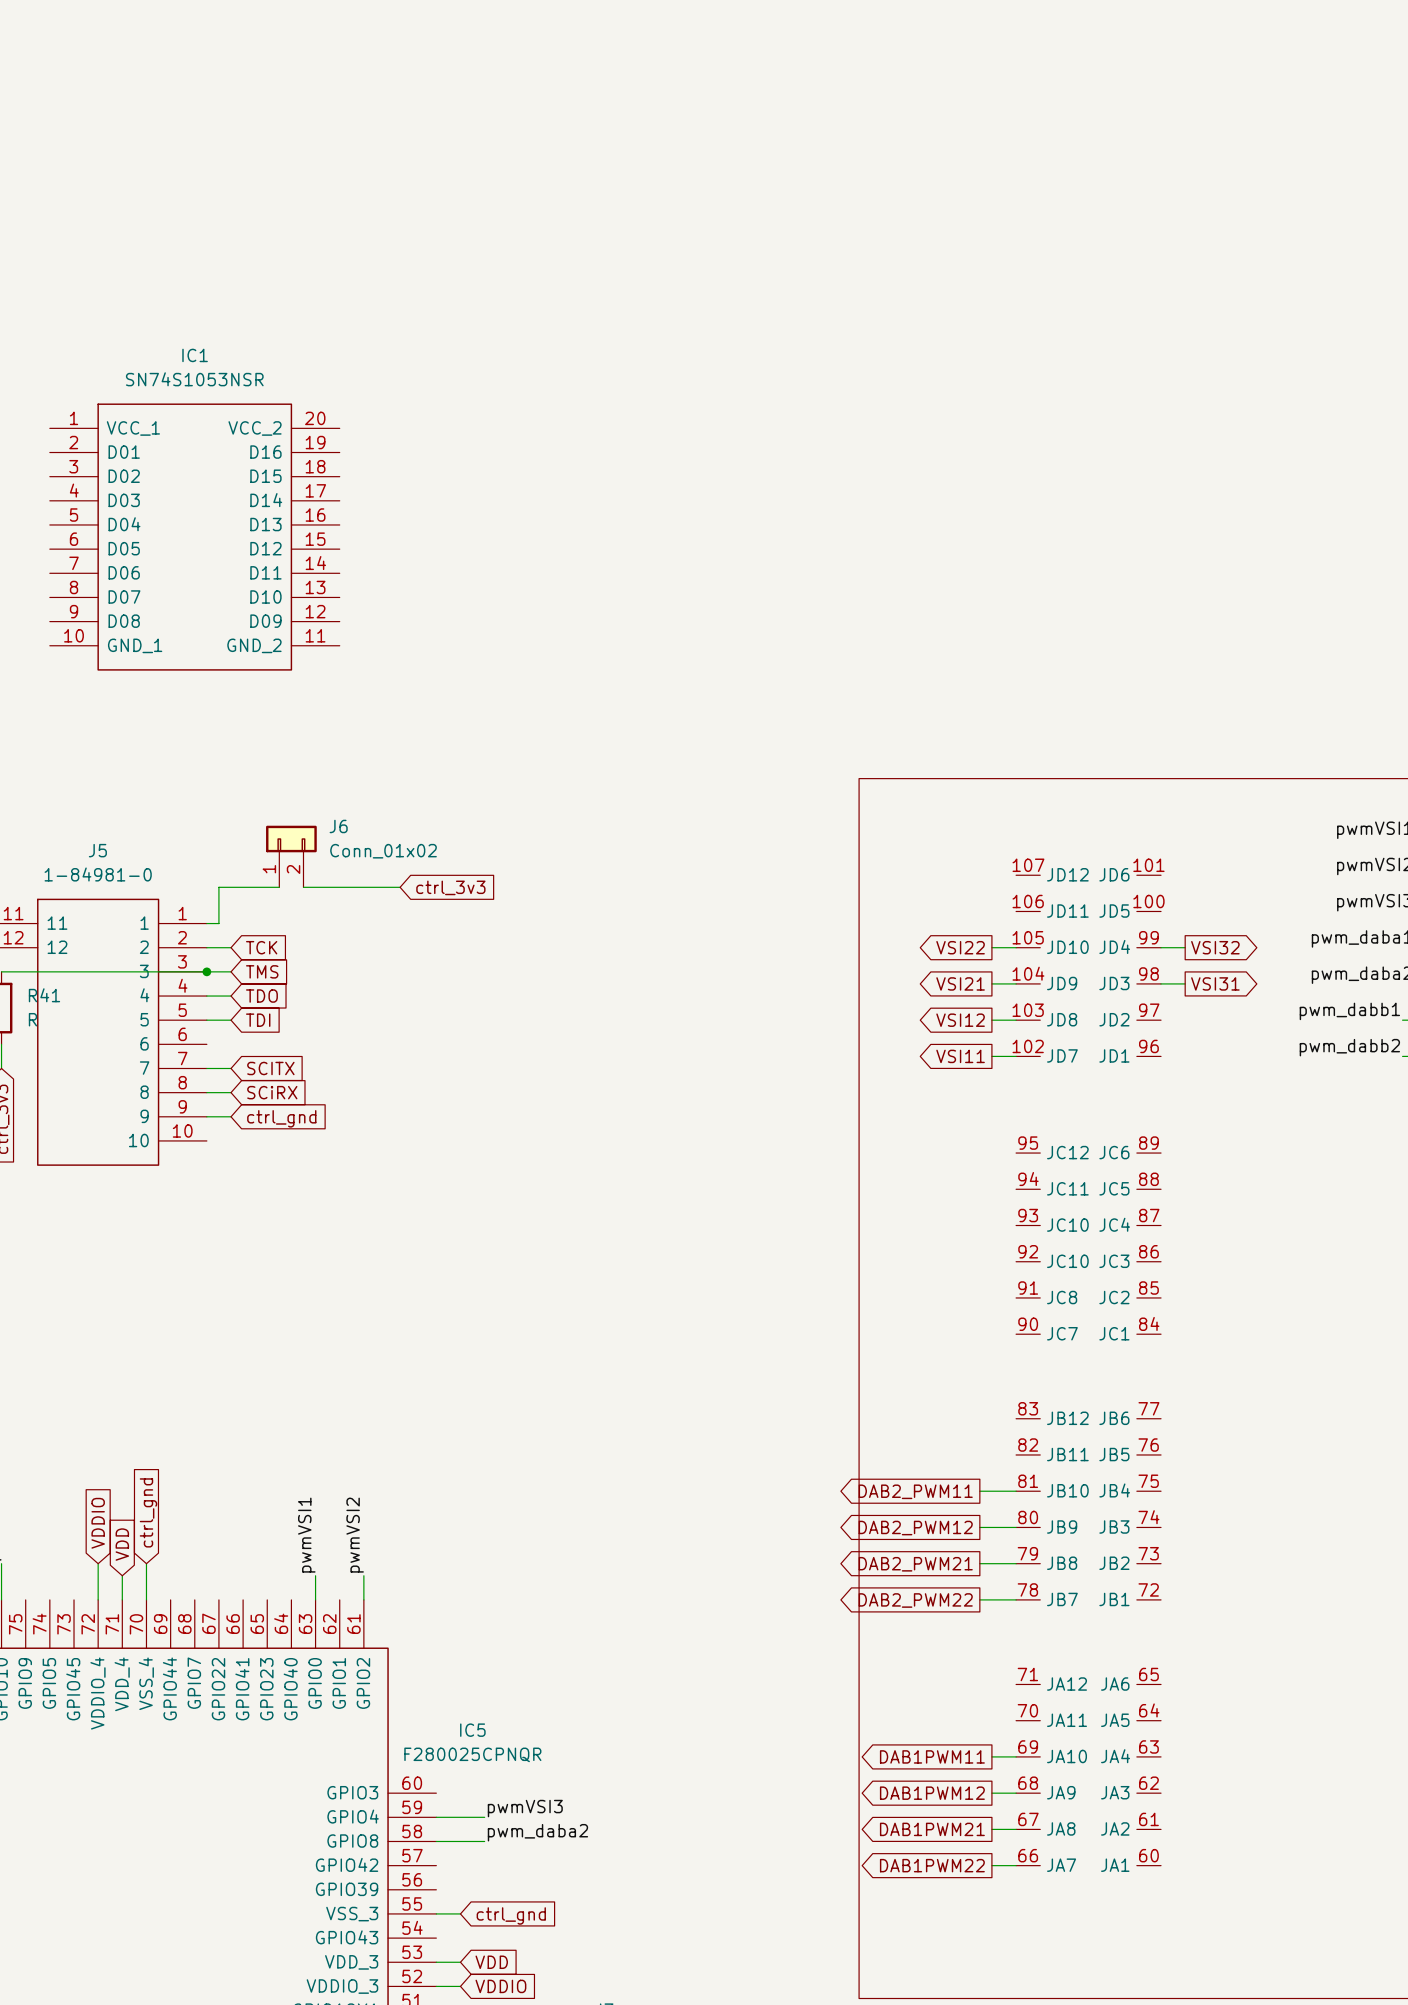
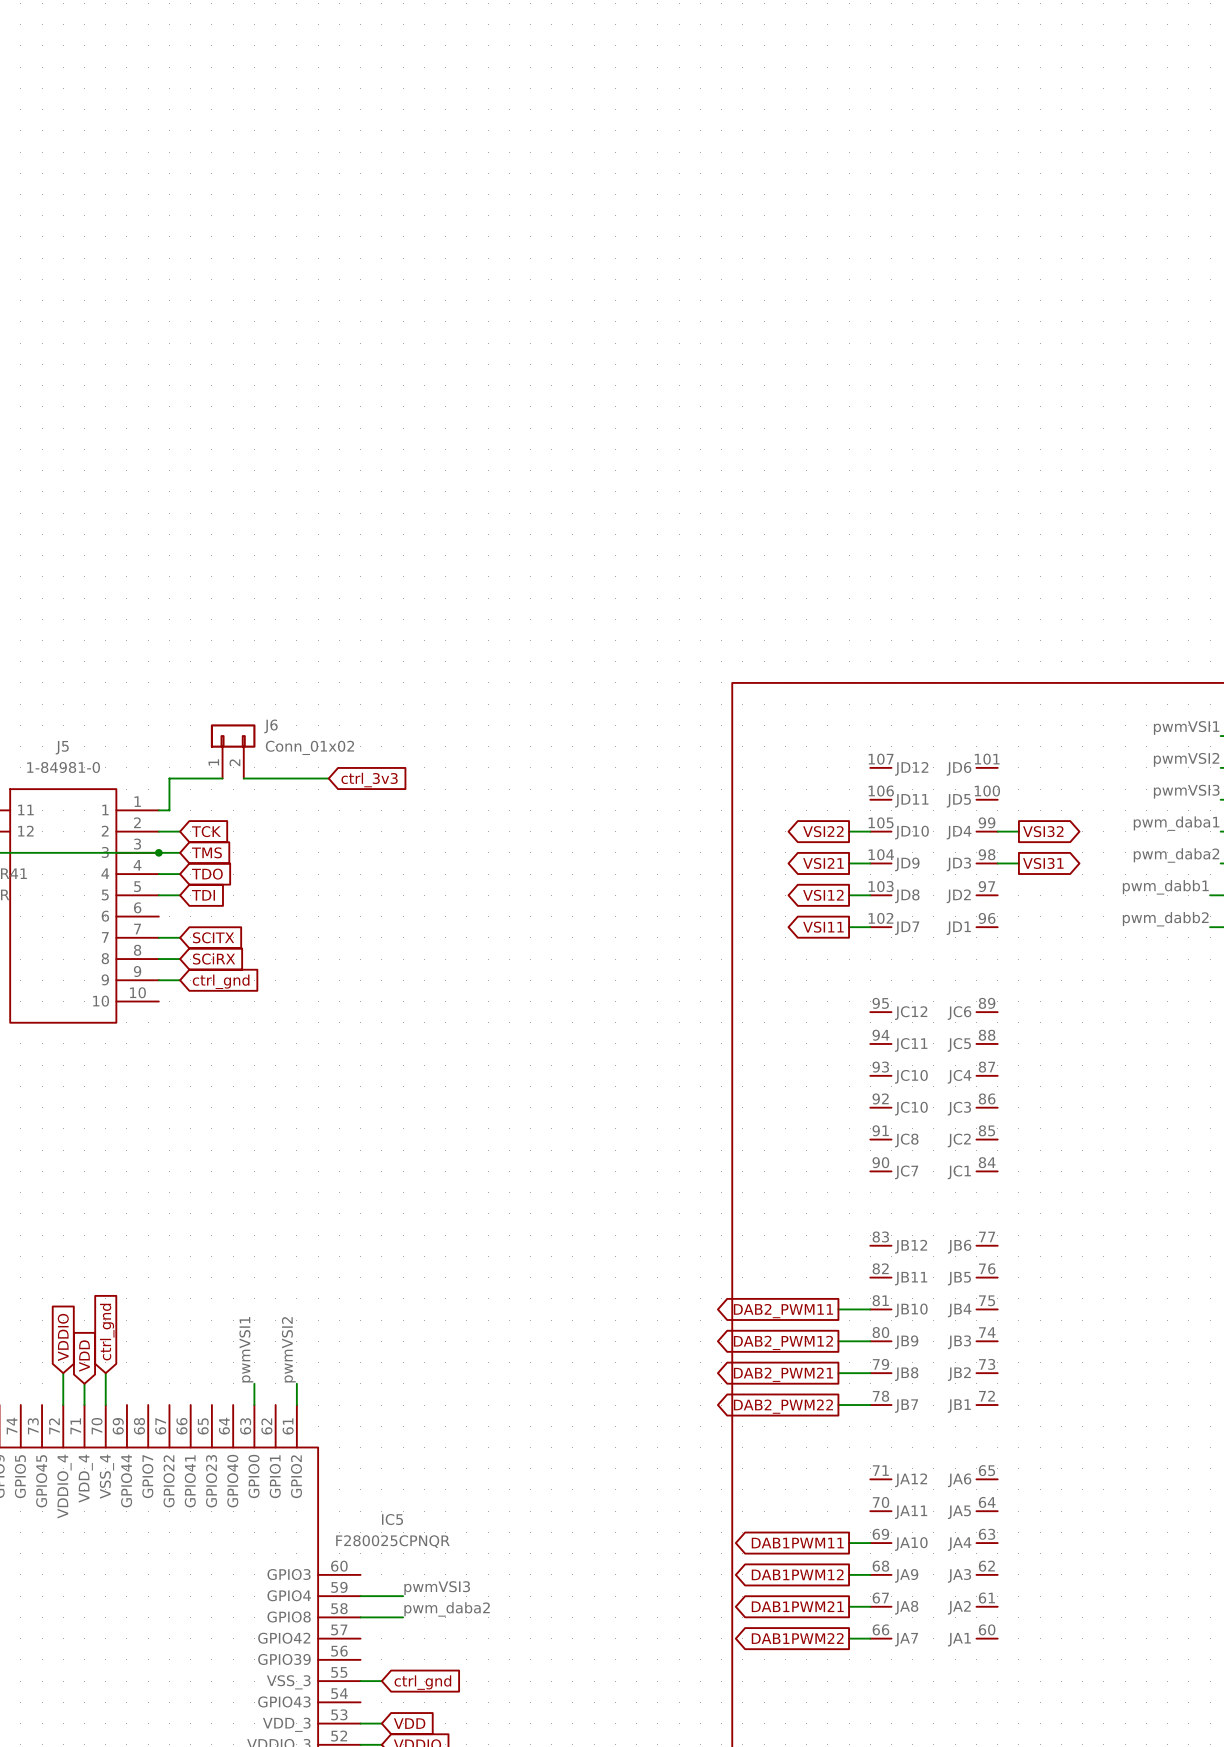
IC1: SN74S1053NSR (194, 537) -> none

